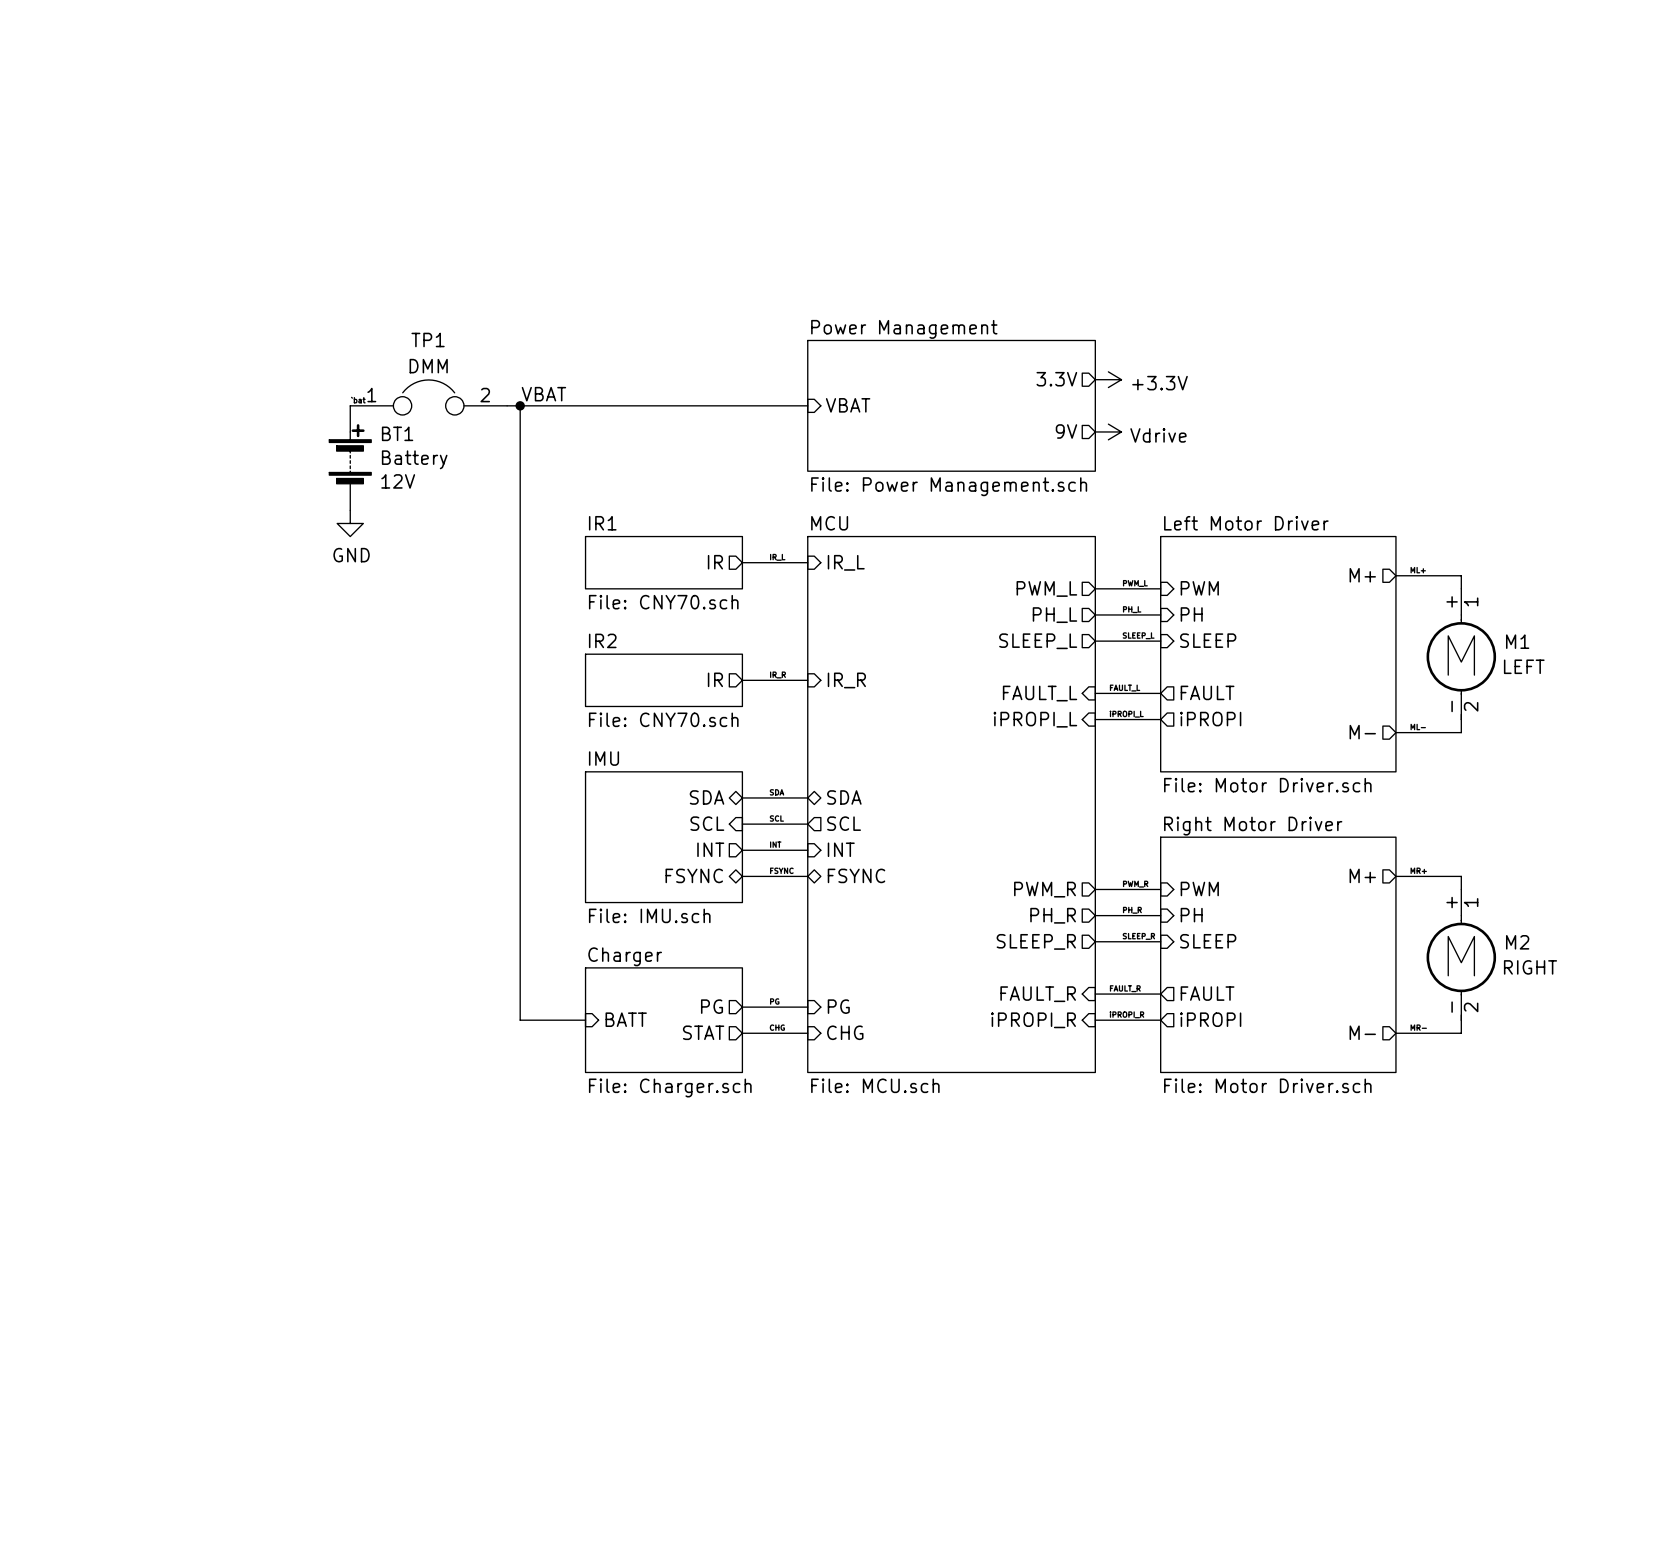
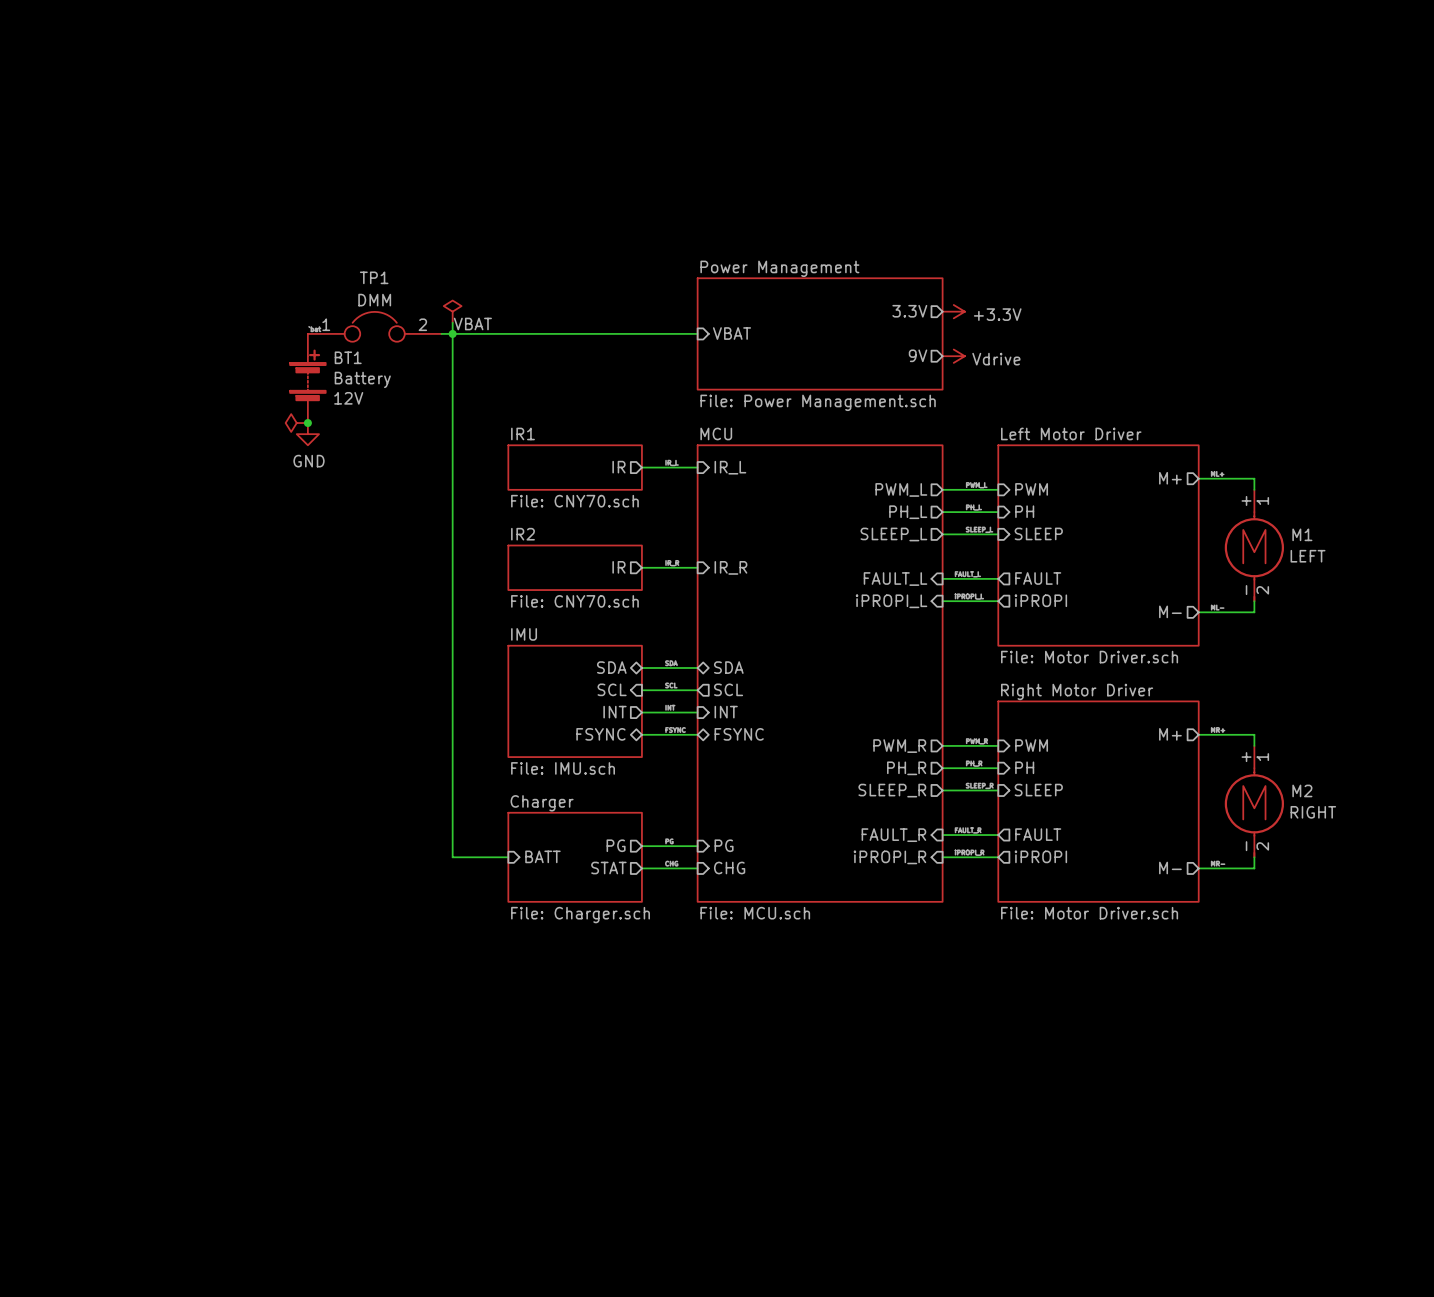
power symbol: none -> (452, 311)
wire: none -> (452, 322) (452, 333)
power symbol: none -> (296, 423)
junction: none -> (307, 423)

